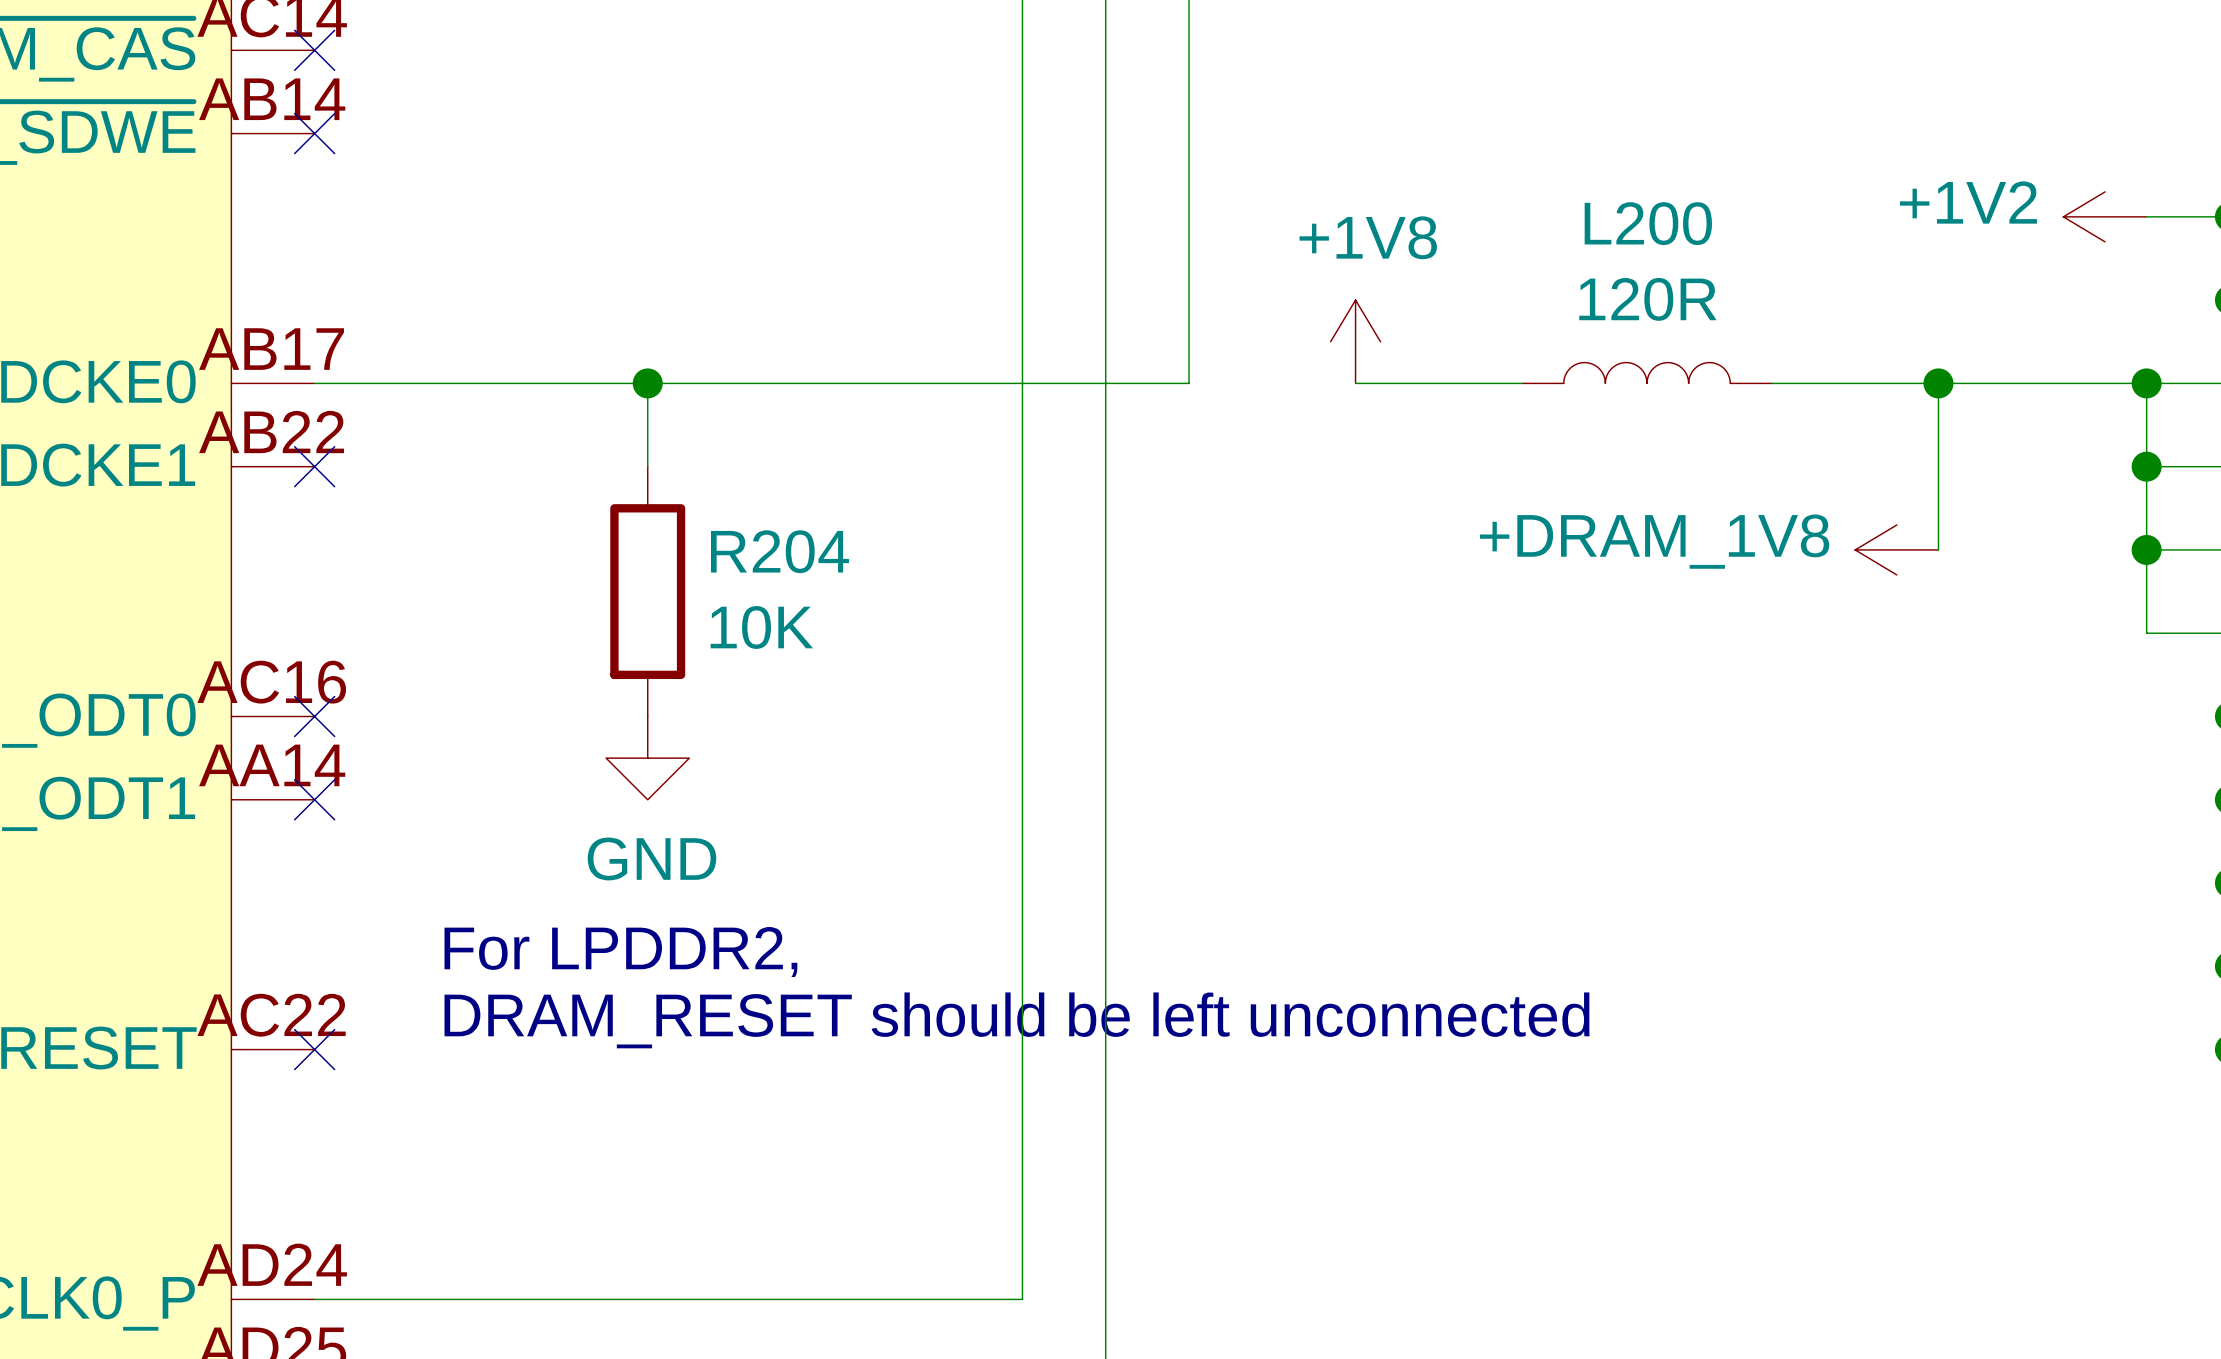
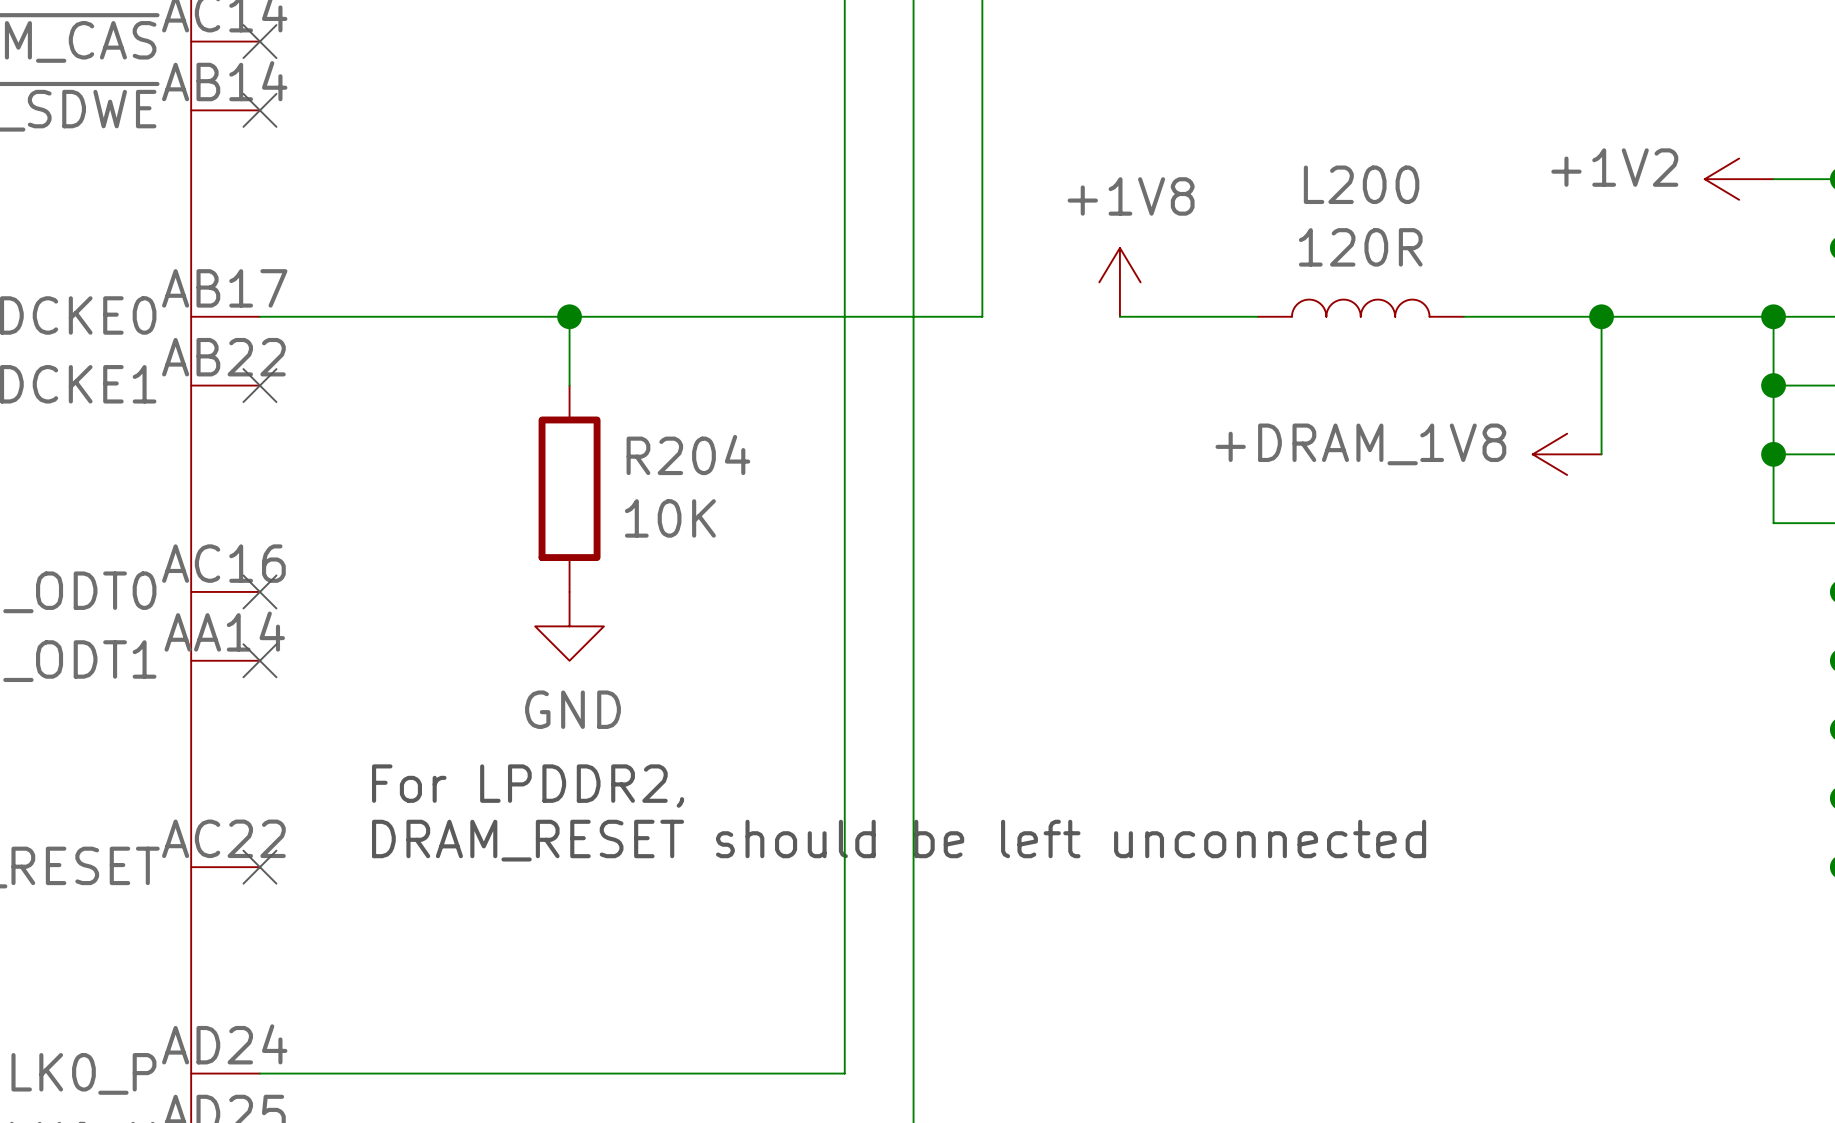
wire: (647, 383) (647, 466) -> (569, 316) (569, 385)
junction position: (647, 383) -> (569, 316)
R204 position: (647, 591) -> (569, 488)
power symbol position: GND (647, 758) -> GND (569, 626)

